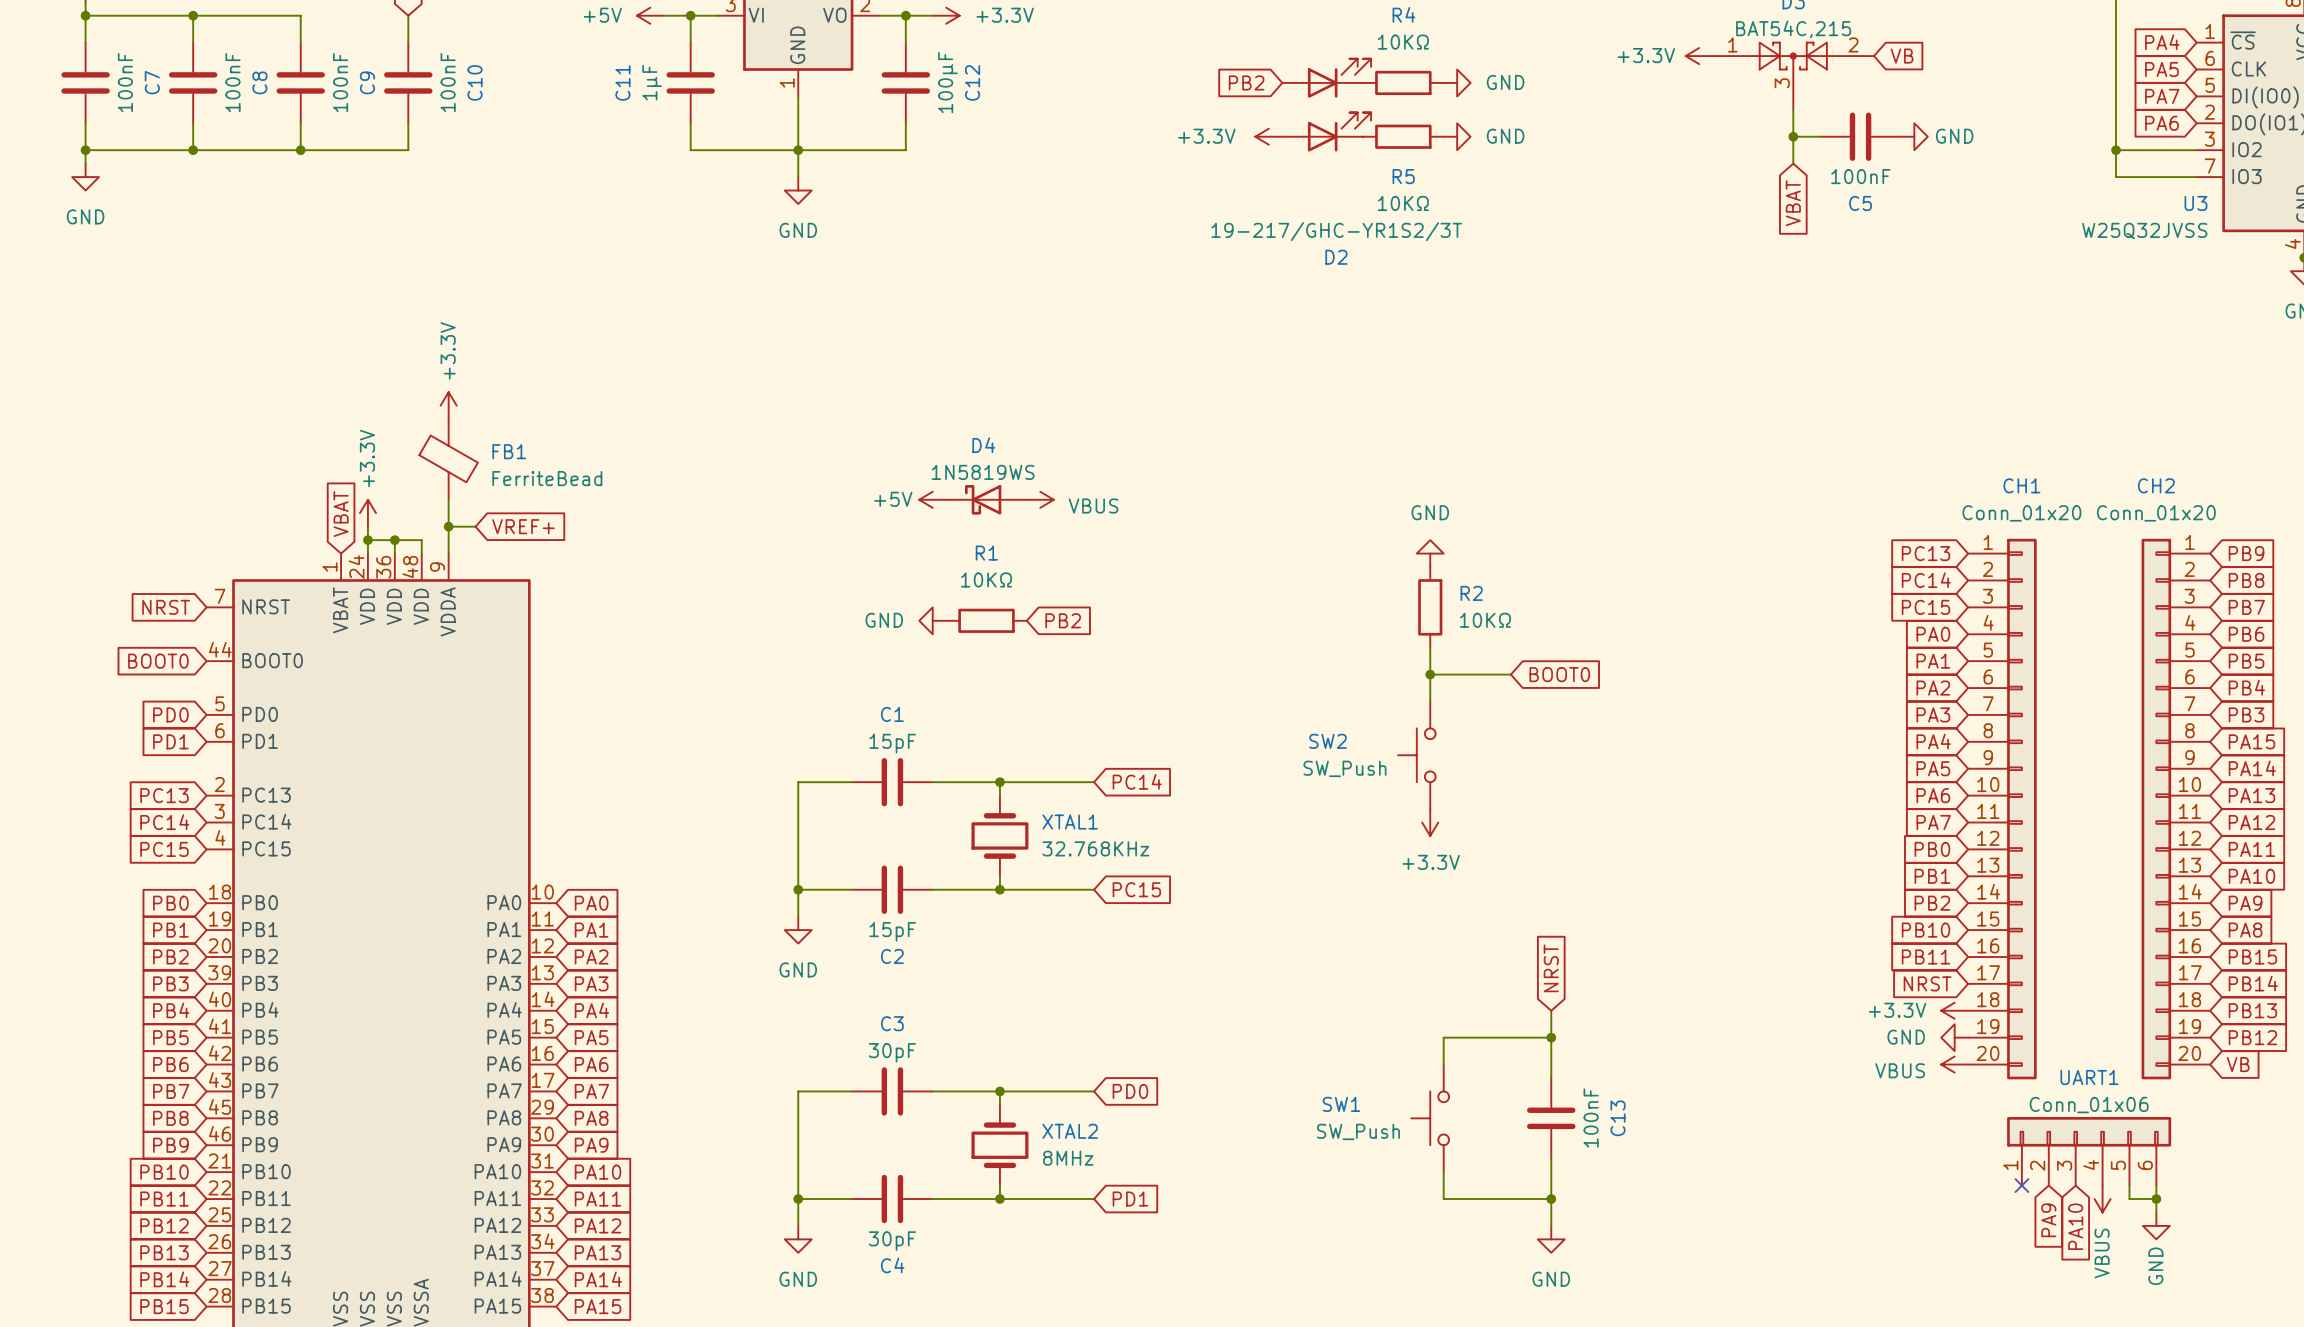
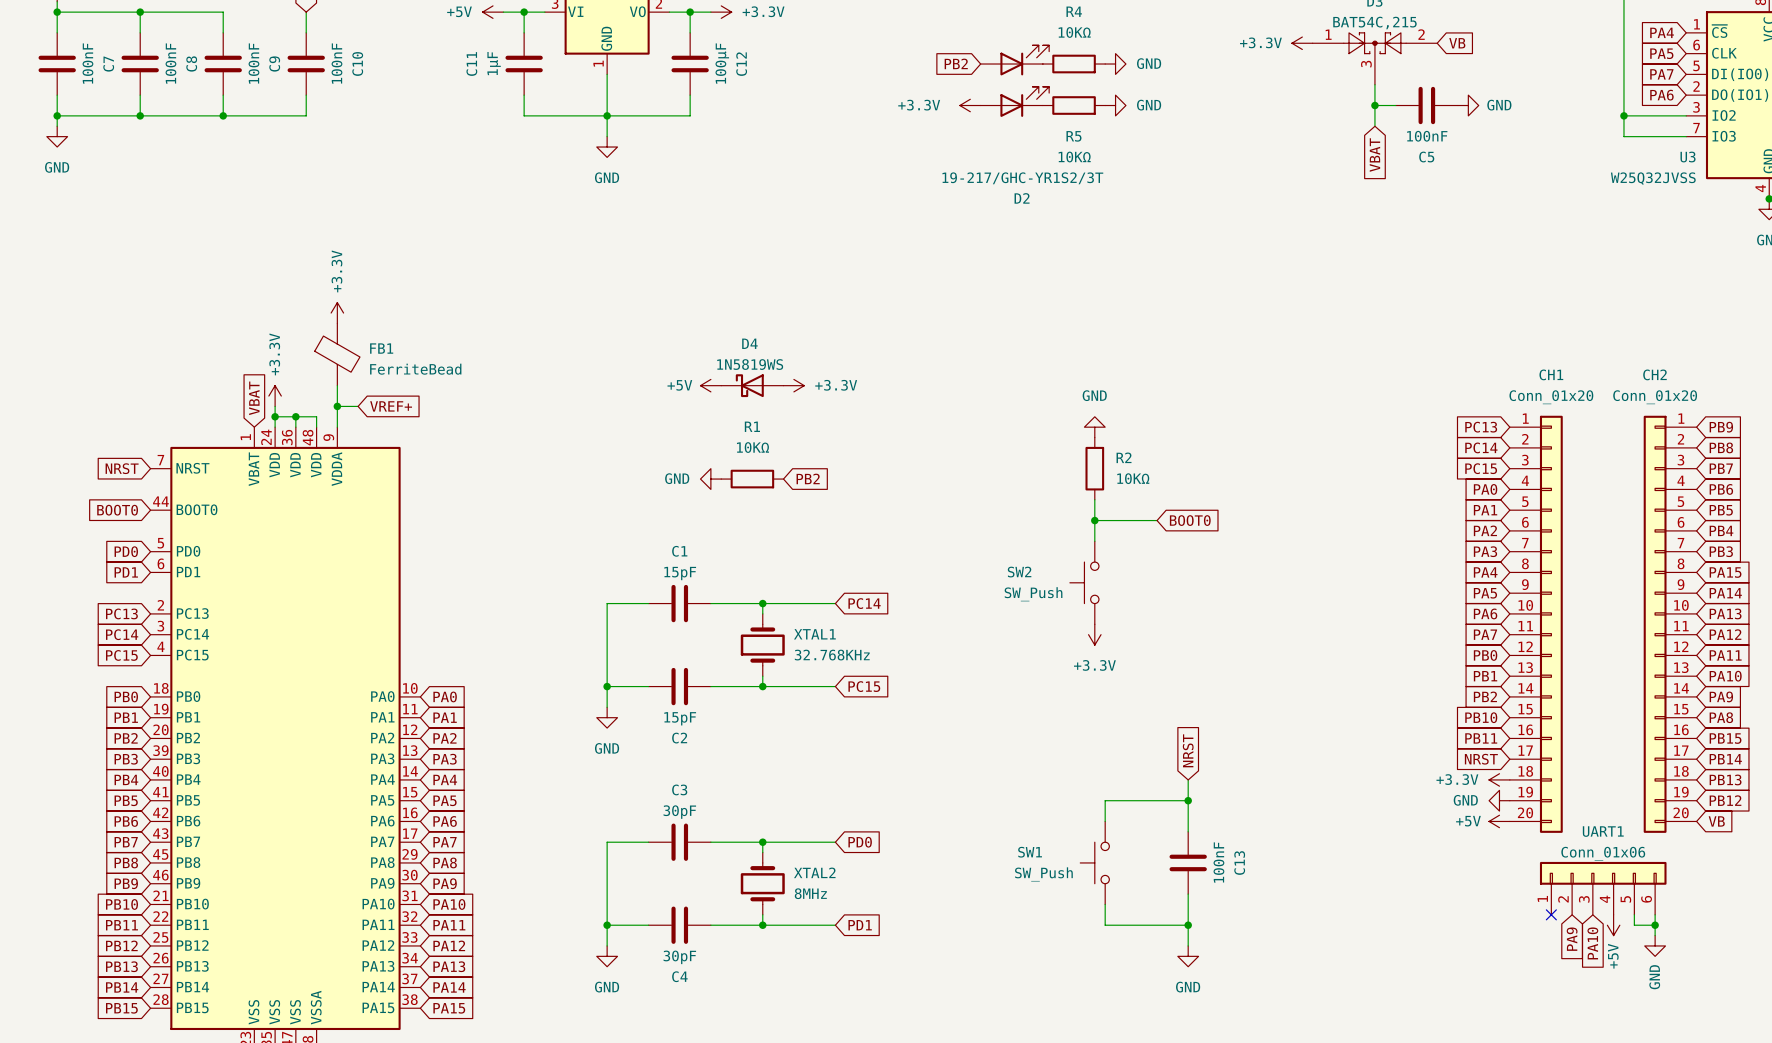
power symbol: VBUS (1040, 499) -> +3.3V (793, 385)
power symbol: VBUS (1954, 1064) -> +5V (1499, 821)
power symbol: VBUS (2102, 1199) -> +5V (1613, 925)

